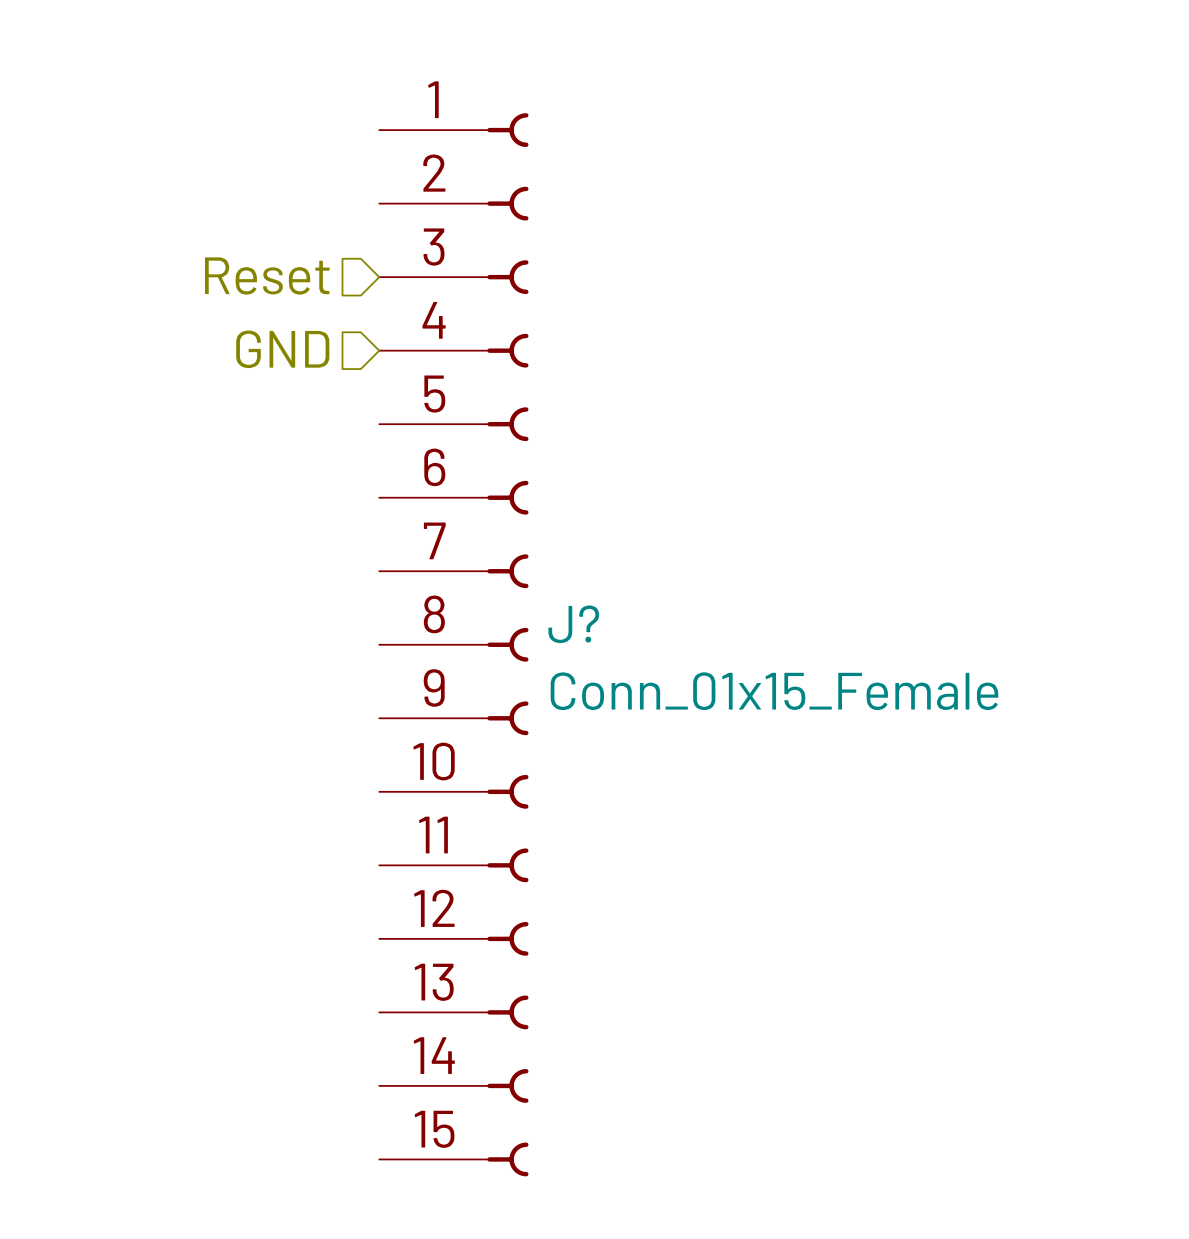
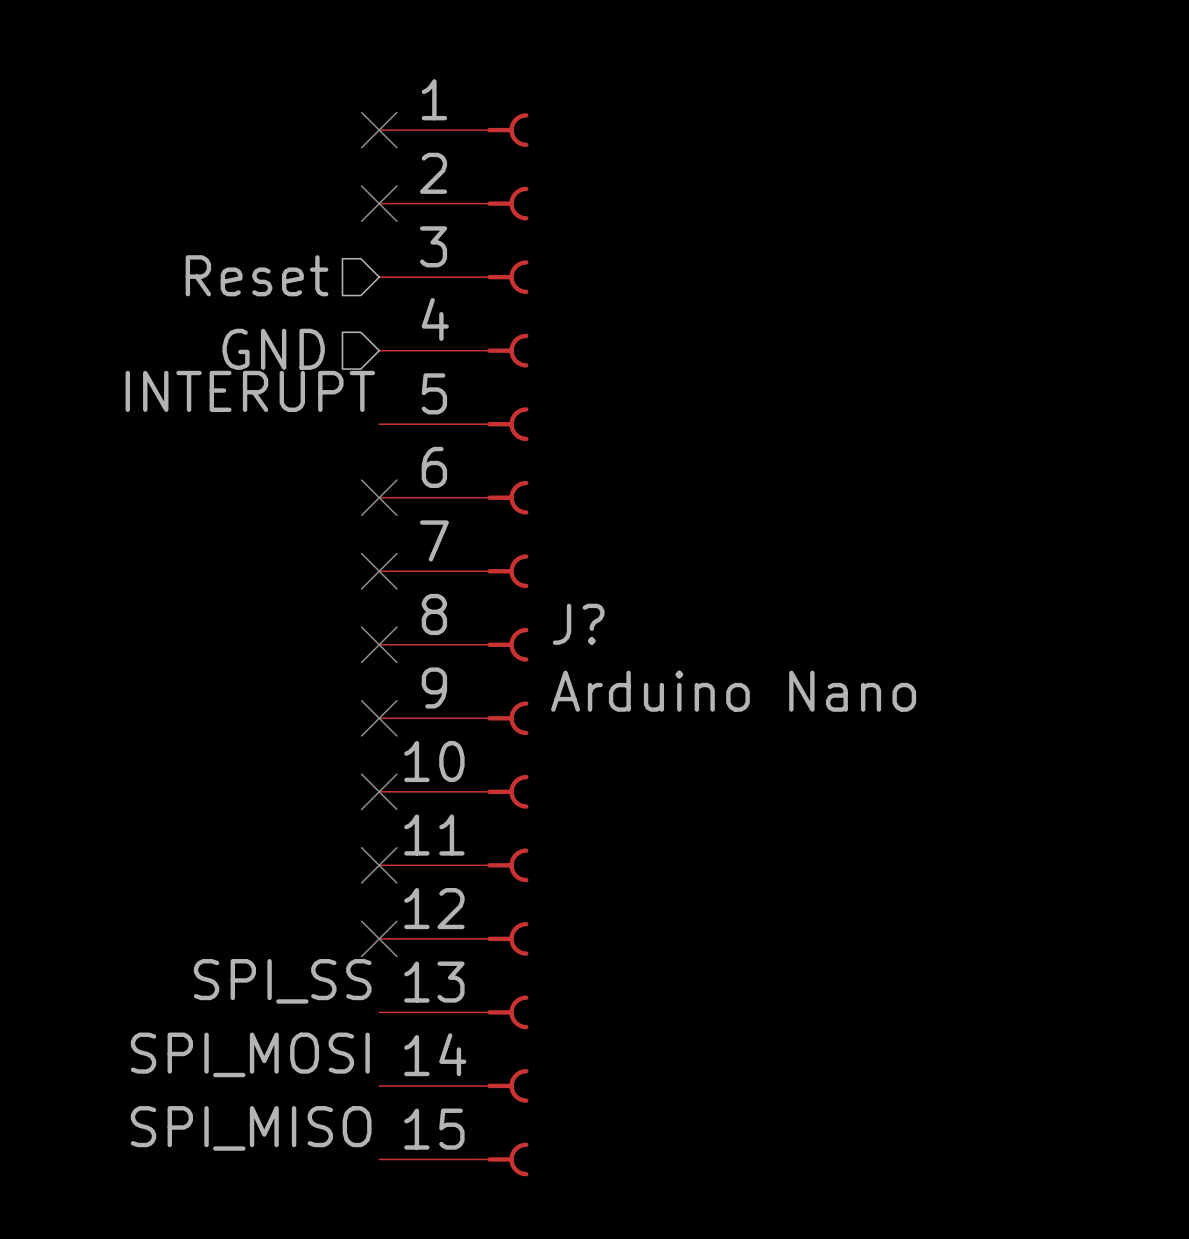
no-connect mark: none -> (379, 130)
no-connect mark: none -> (379, 203)
label: none -> INTERUPT (250, 391)
no-connect mark: none -> (379, 497)
no-connect mark: none -> (379, 571)
no-connect mark: none -> (379, 644)
J? value: Conn_01x15_Female (774, 691) -> Arduino Nano (733, 691)
no-connect mark: none -> (379, 718)
no-connect mark: none -> (379, 791)
no-connect mark: none -> (379, 865)
no-connect mark: none -> (379, 938)
label: none -> SPI_SS (282, 981)
label: none -> SPI_MOSI (250, 1054)
label: none -> SPI_MISO (251, 1128)

